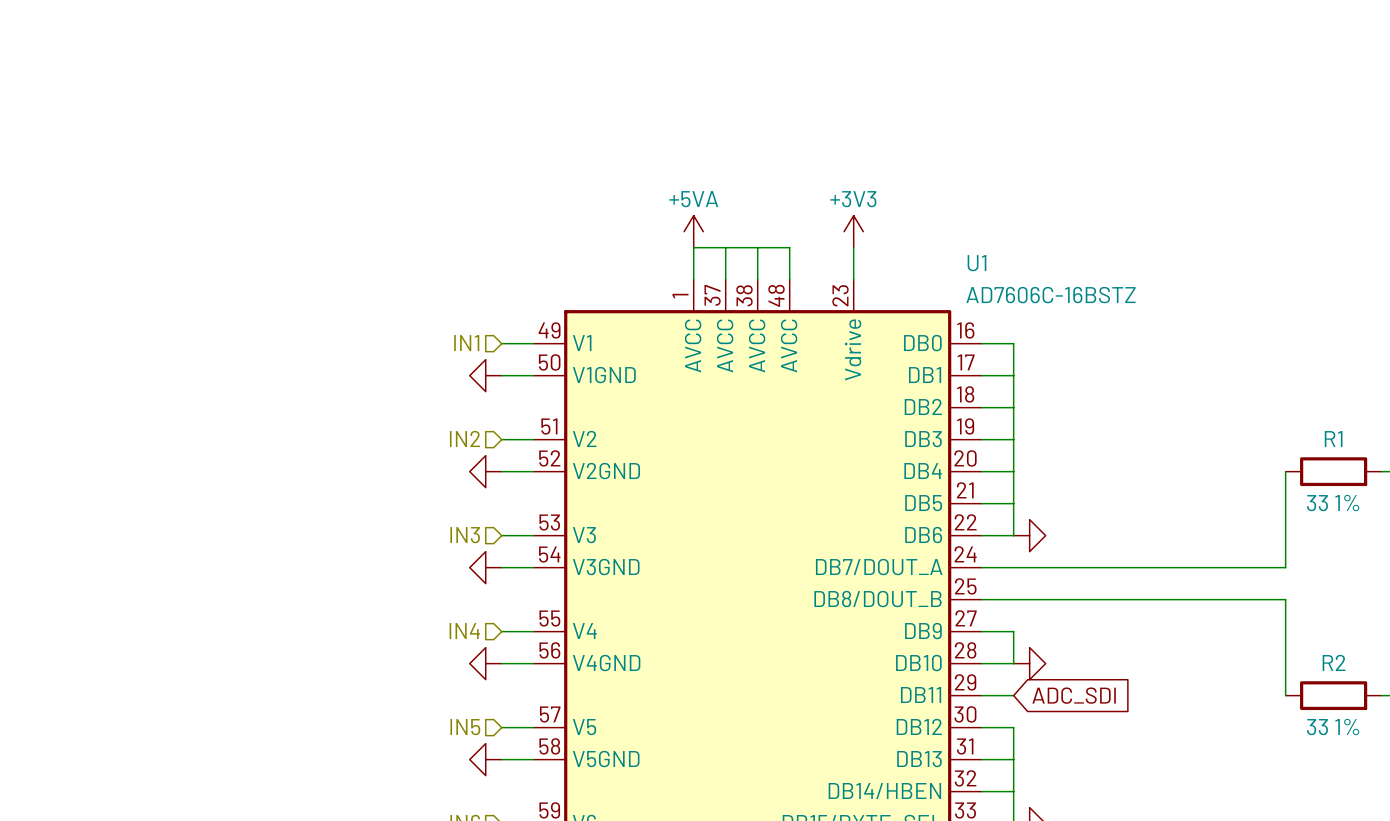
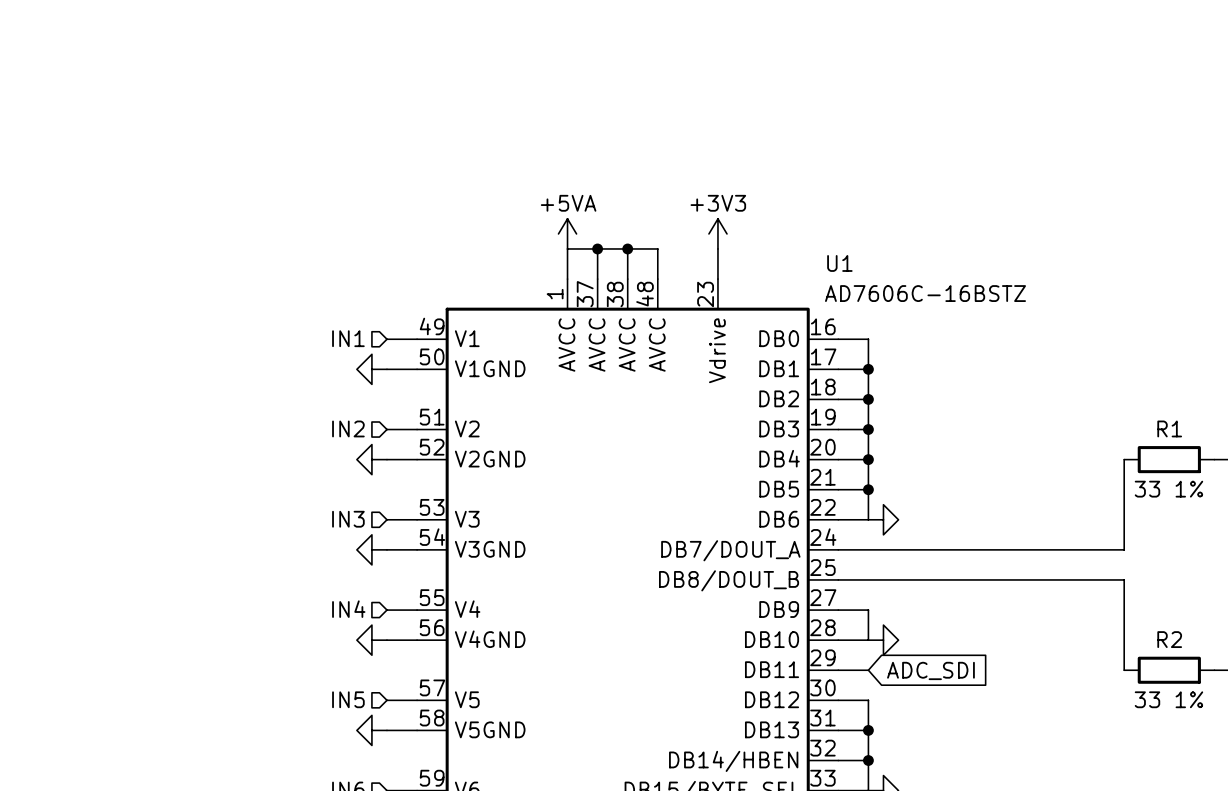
junction: none -> (597, 248)
junction: none -> (627, 248)
junction: none -> (868, 369)
junction: none -> (868, 399)
junction: none -> (868, 429)
junction: none -> (868, 459)
junction: none -> (868, 489)
junction: none -> (868, 730)
junction: none -> (868, 760)

